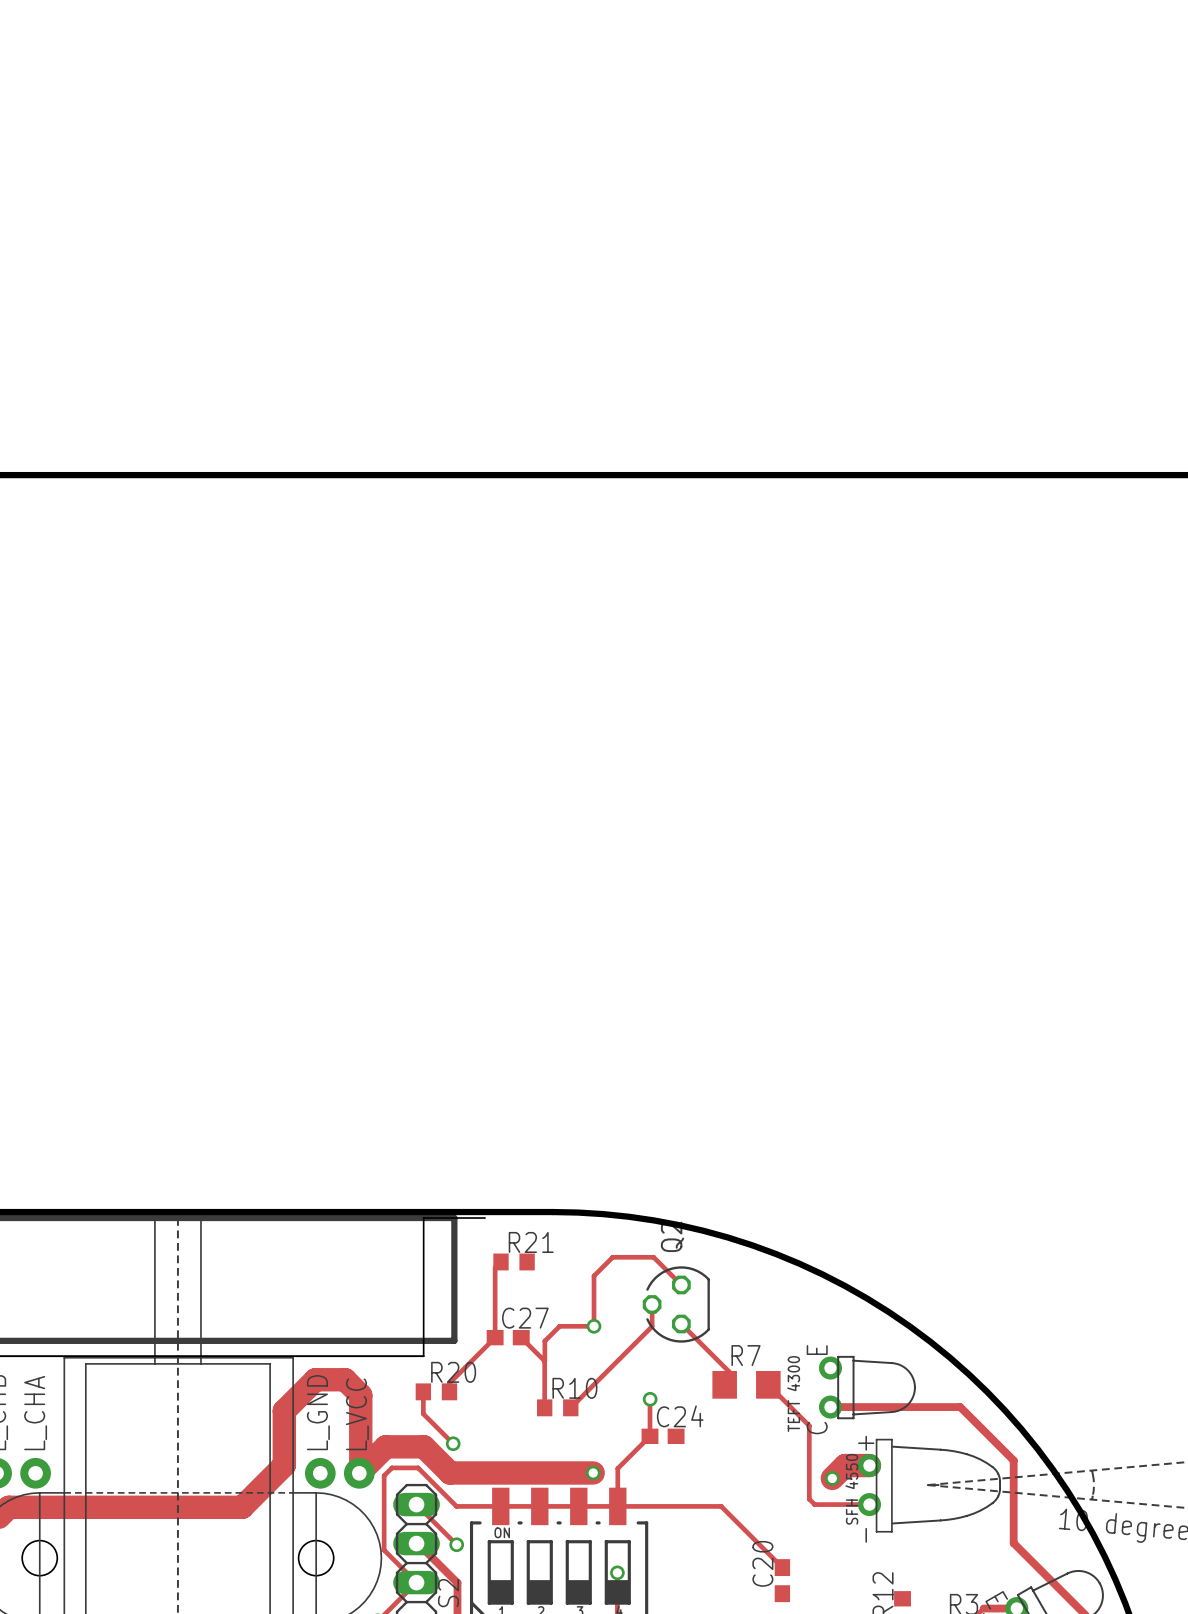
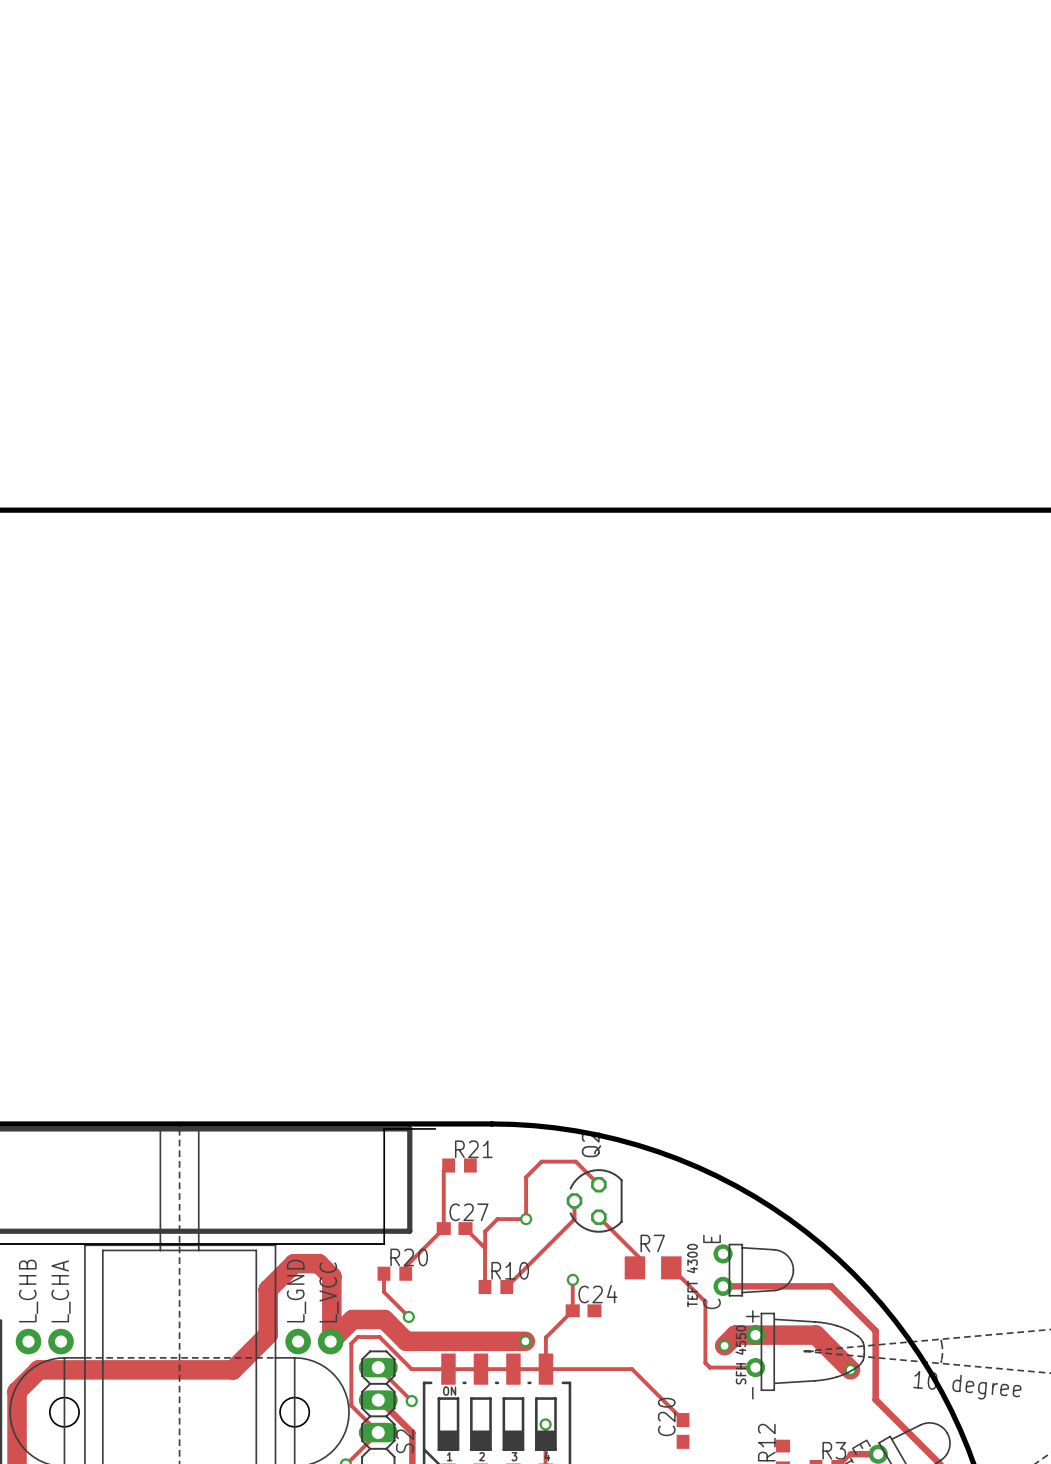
track: none -> (755, 1335) (815, 1335) (850, 1369)
via: none -> (850, 1369)

